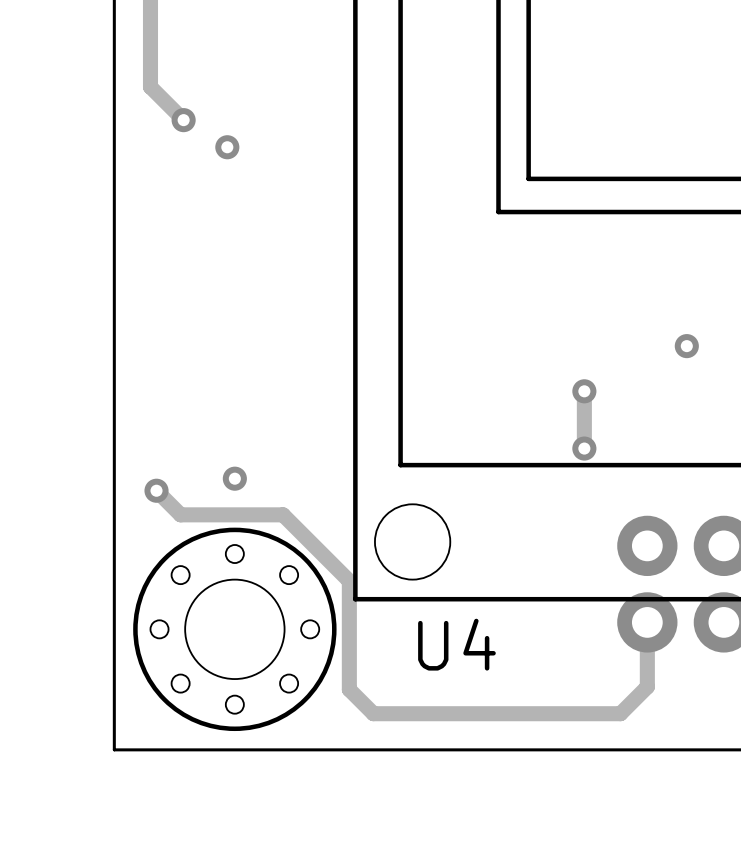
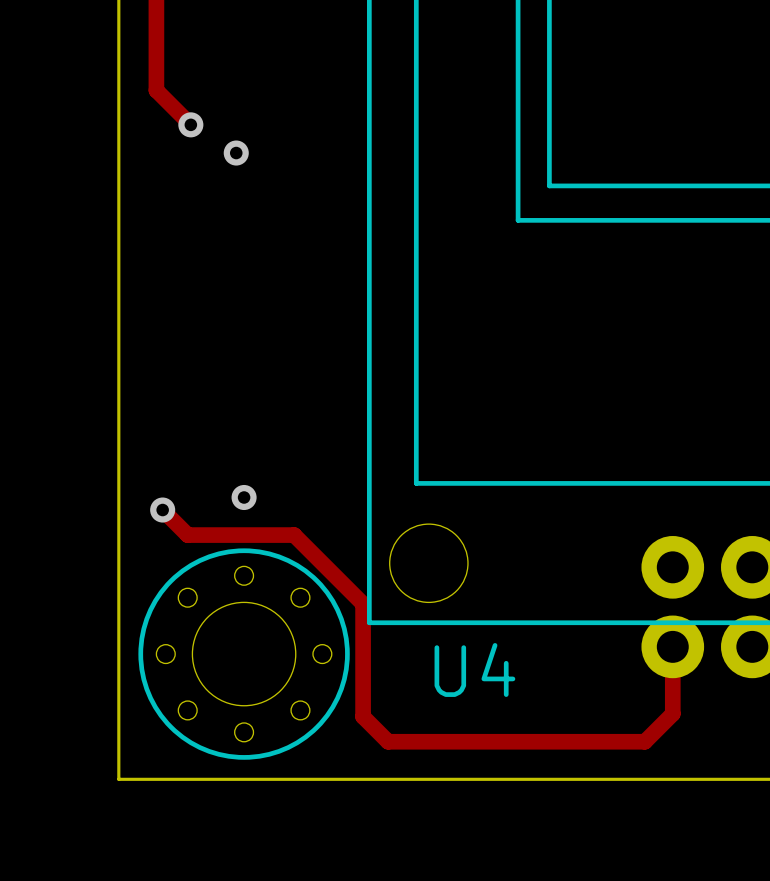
via: (686, 346) -> none
track: (584, 391) (584, 448) -> none
via: (584, 391) -> none
via: (584, 448) -> none

